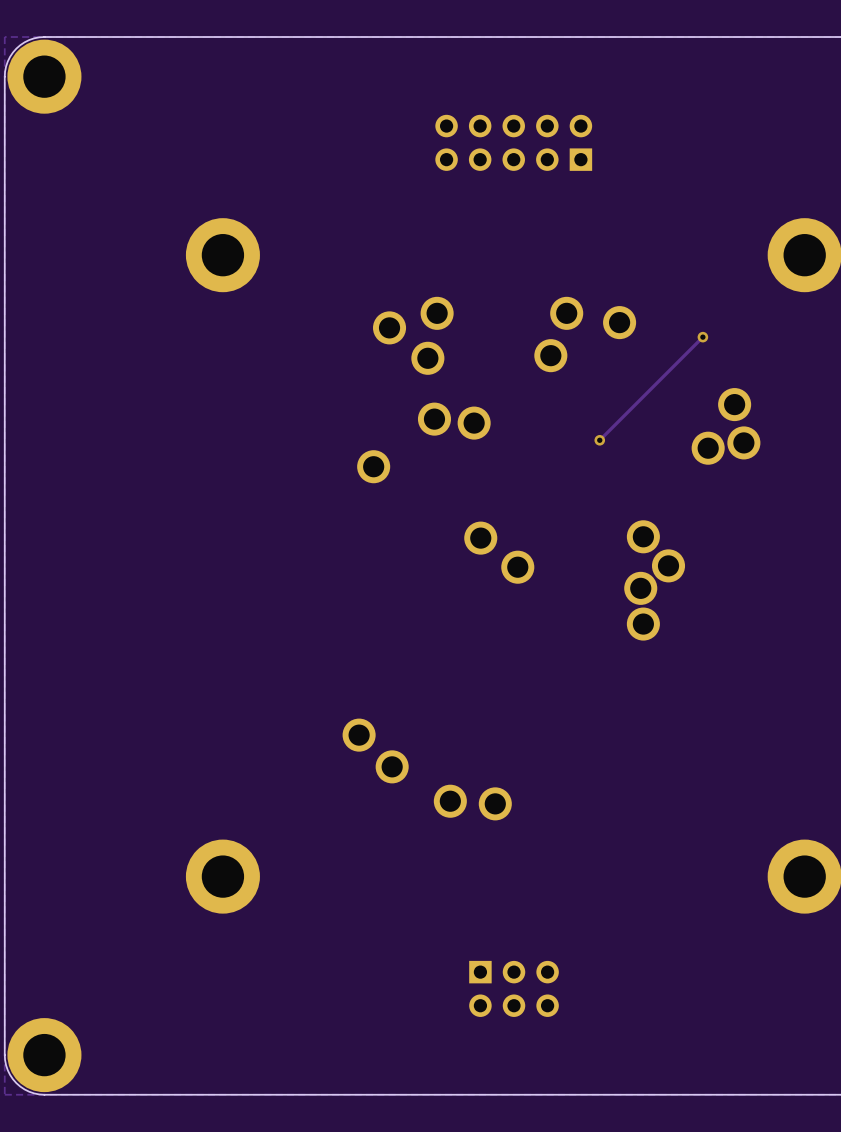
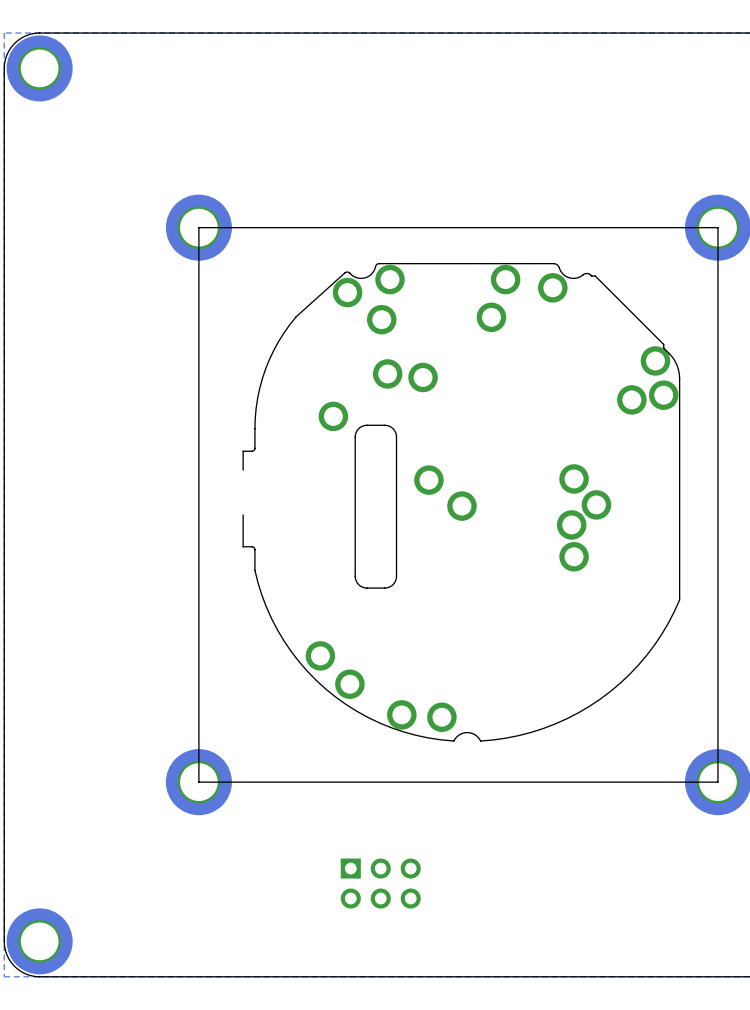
part: (513, 142) -> none
board edge: none -> (717, 227) (198, 227) (198, 782) (717, 782) (717, 227)
drawing: none -> [242, 263, 681, 742]
track: (702, 337) (599, 440) -> none
via: (702, 337) -> none
via: (599, 440) -> none
part position: (514, 988) -> (380, 883)

